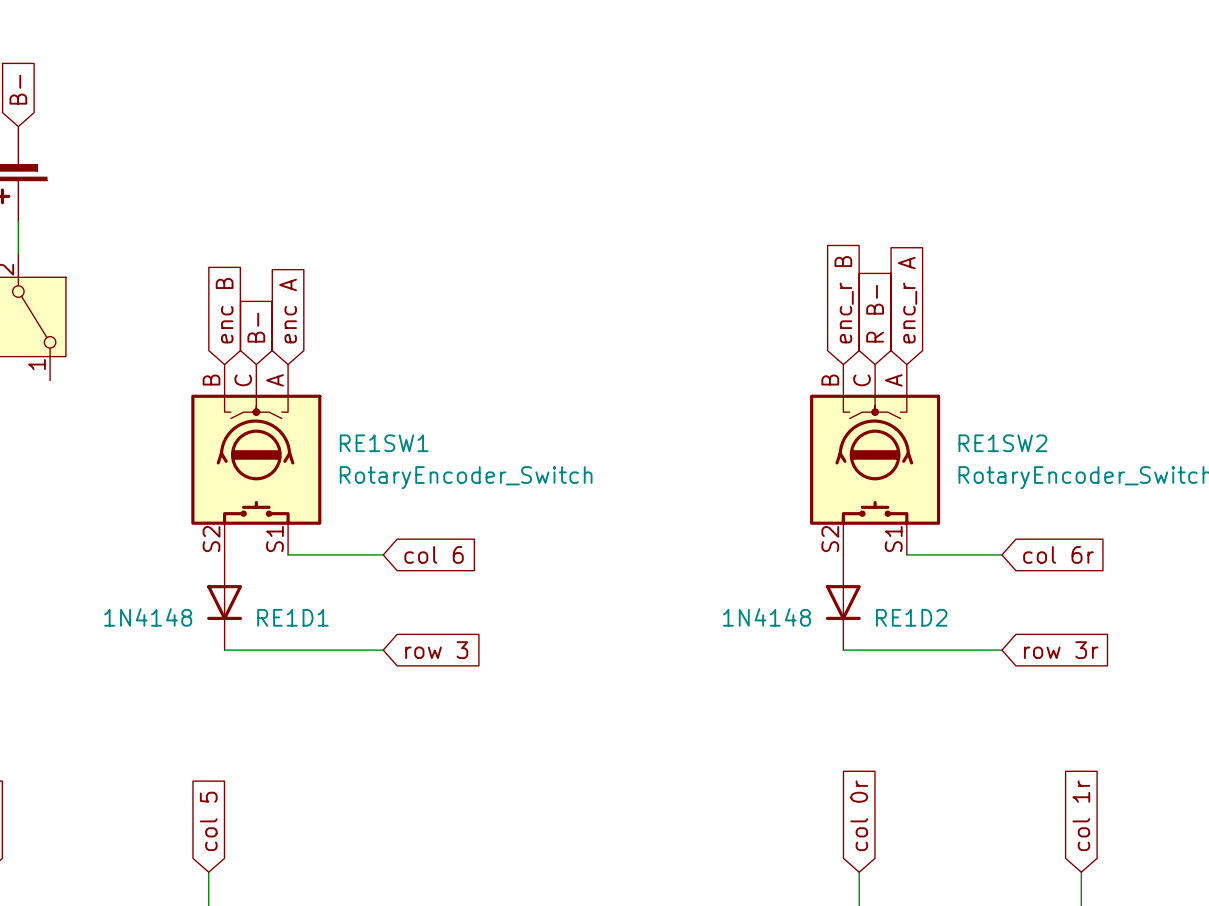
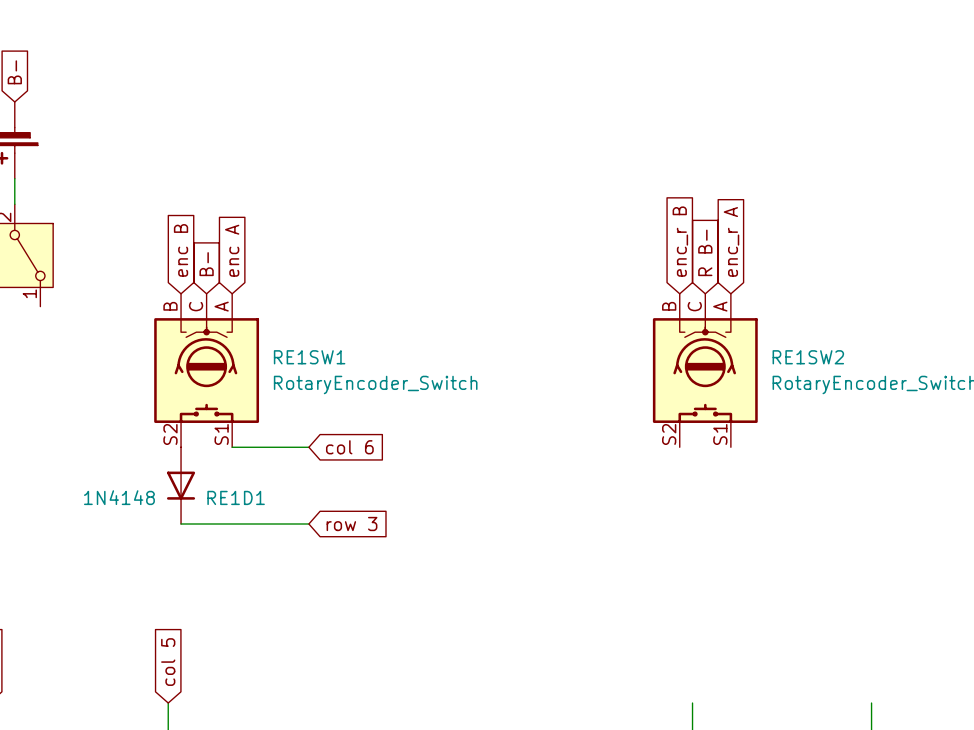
wire: (906, 554) (1002, 554) -> none
global label: col 6r (1058, 554) -> none
RE1D2: 1N4148 (843, 602) -> none
wire: (843, 650) (1002, 650) -> none
global label: row 3r (1061, 650) -> none
global label: col 0r (859, 815) -> none
global label: col 1r (1081, 815) -> none

